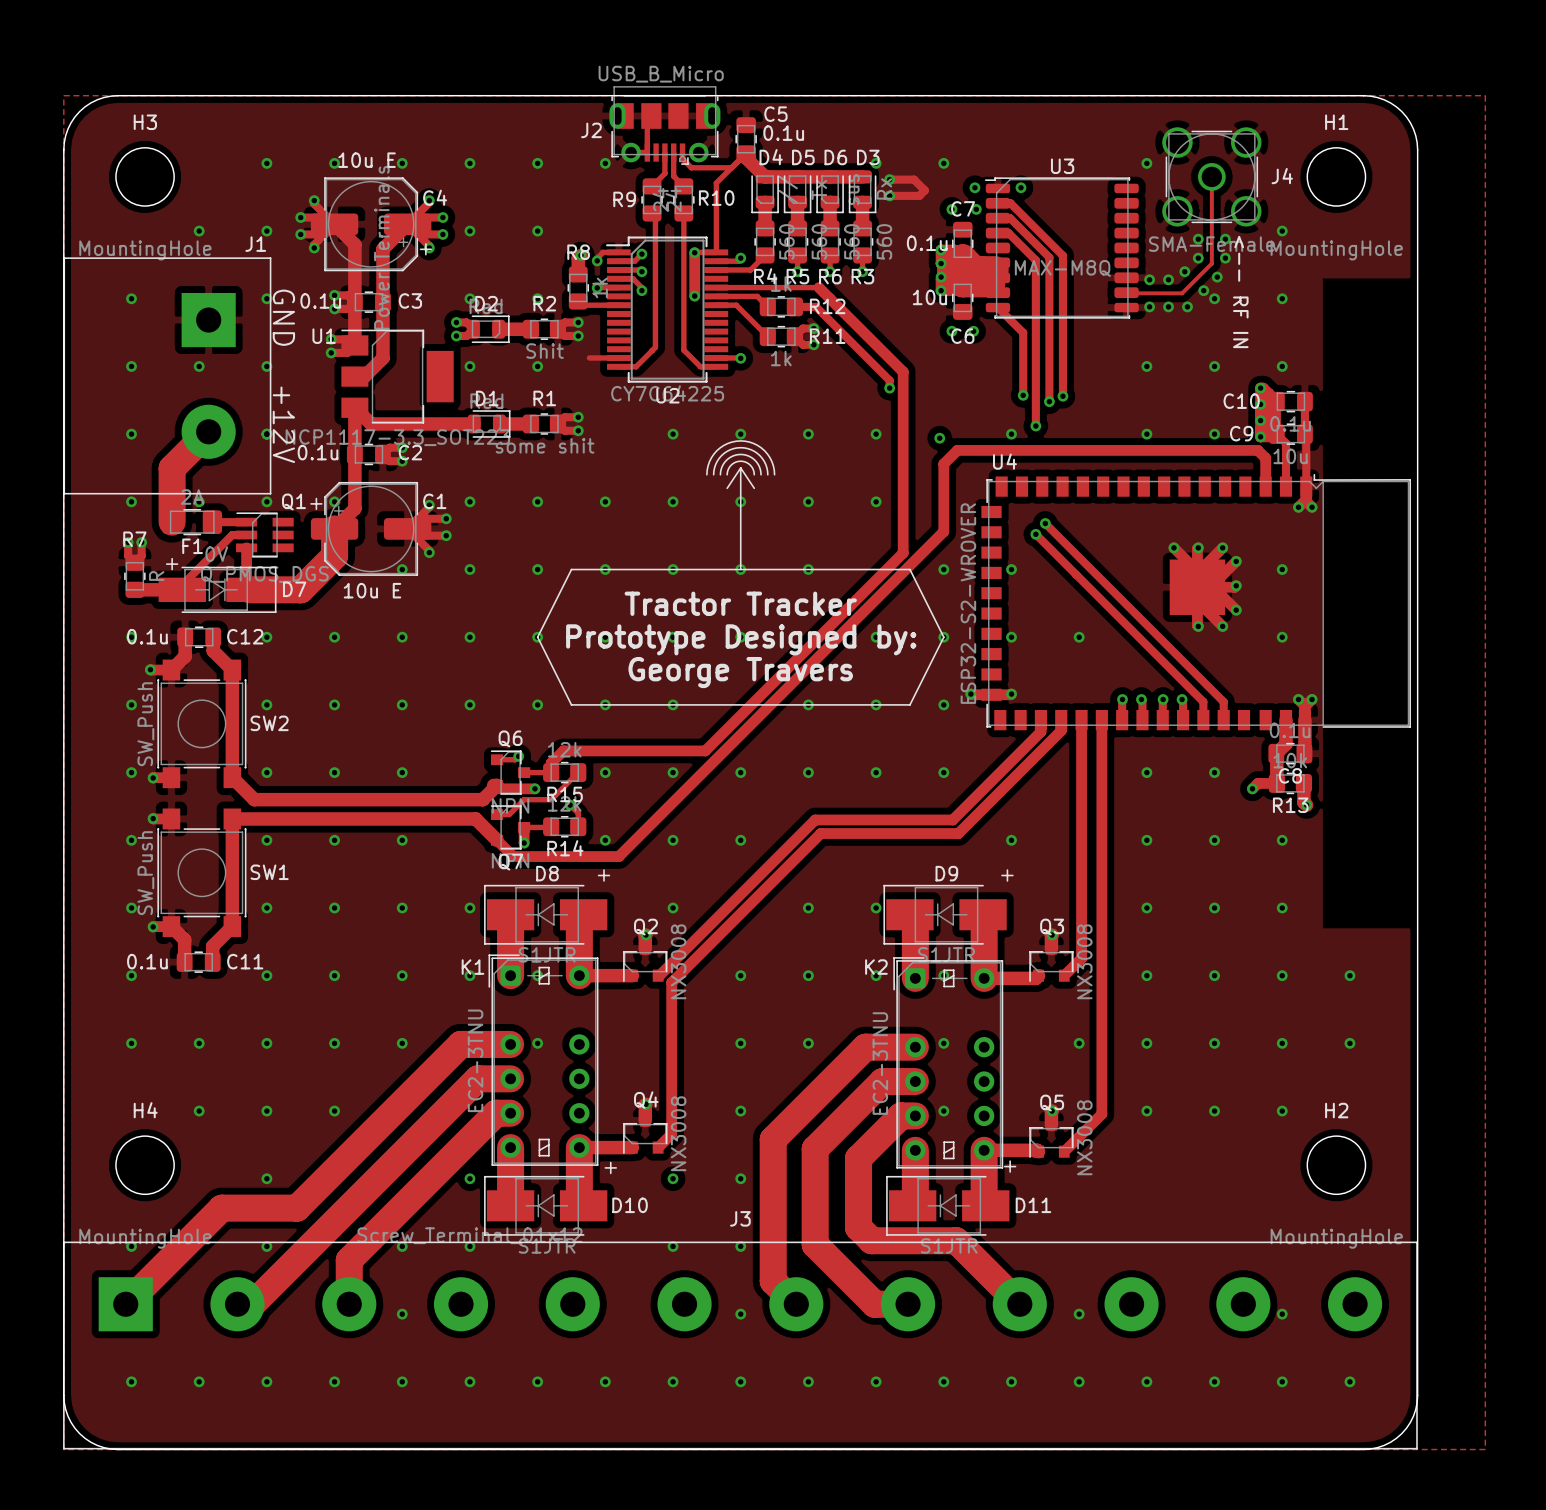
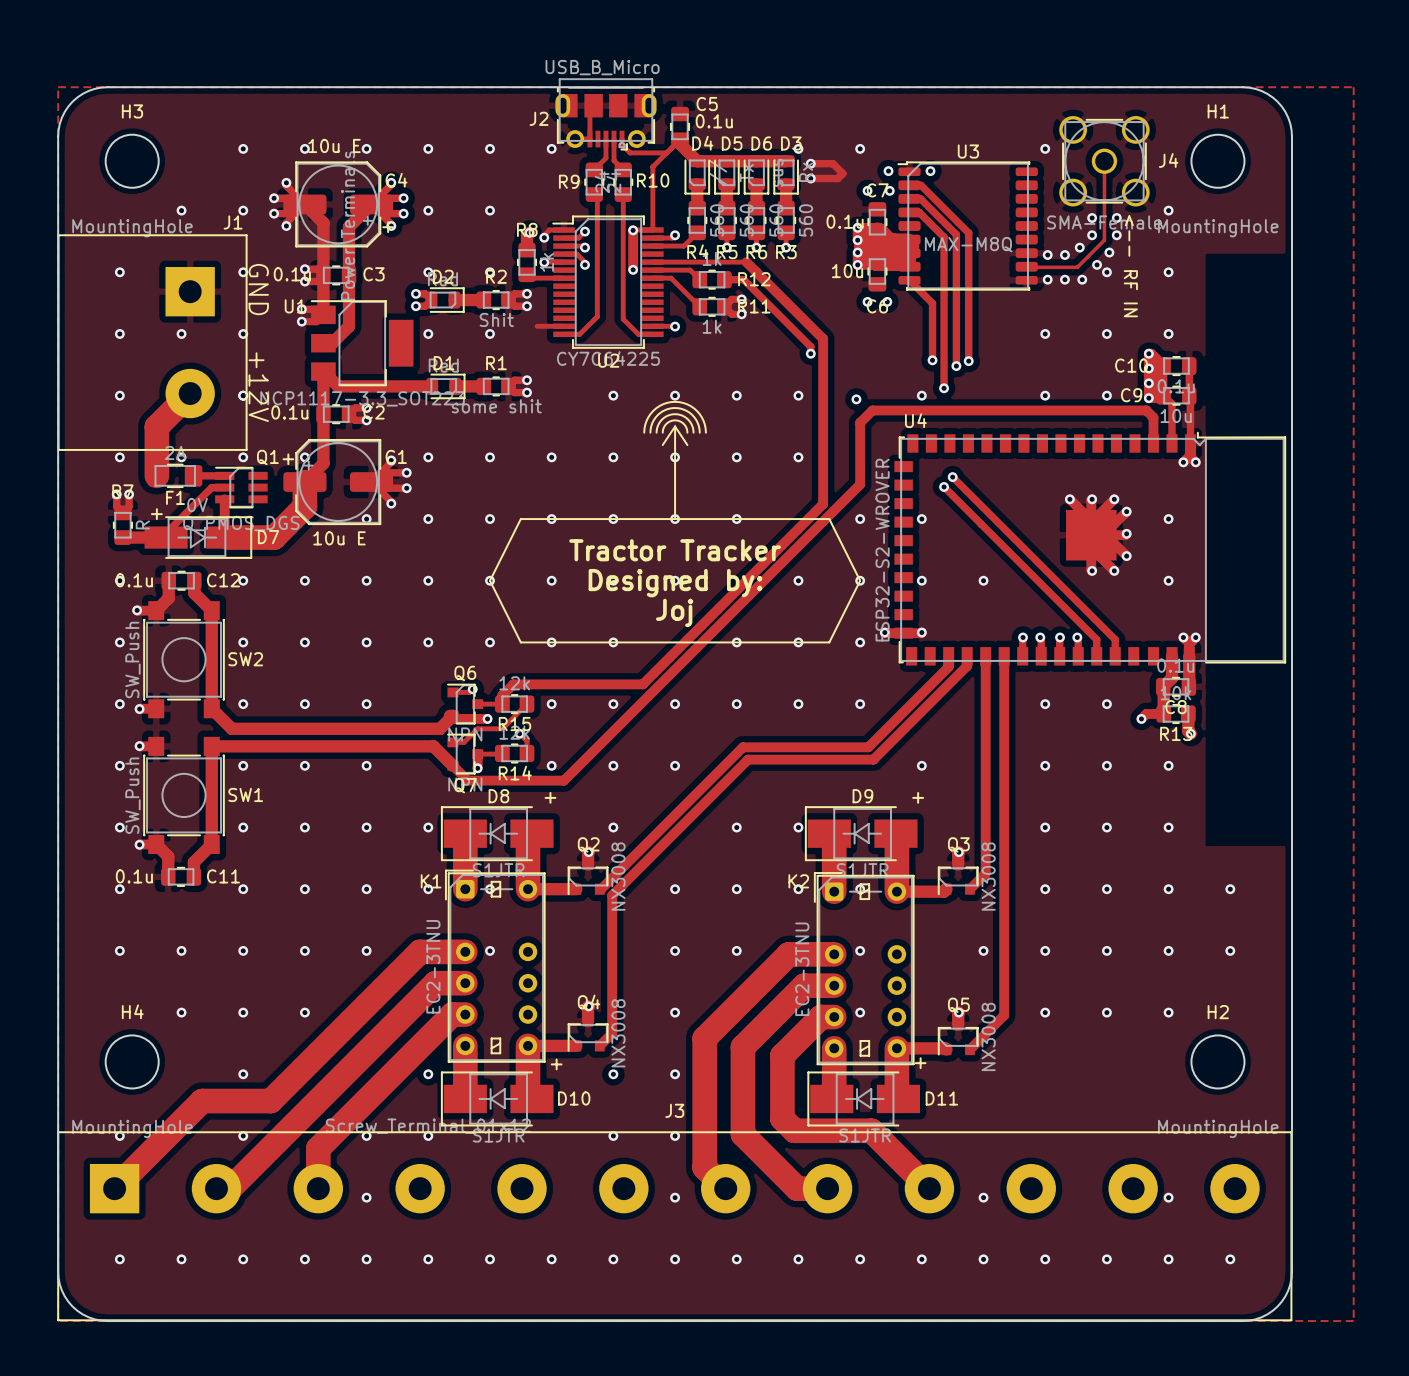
text: Prototype Designed by: (741, 639) -> Designed by: (675, 583)
text: George Travers (740, 672) -> Joj (674, 612)

